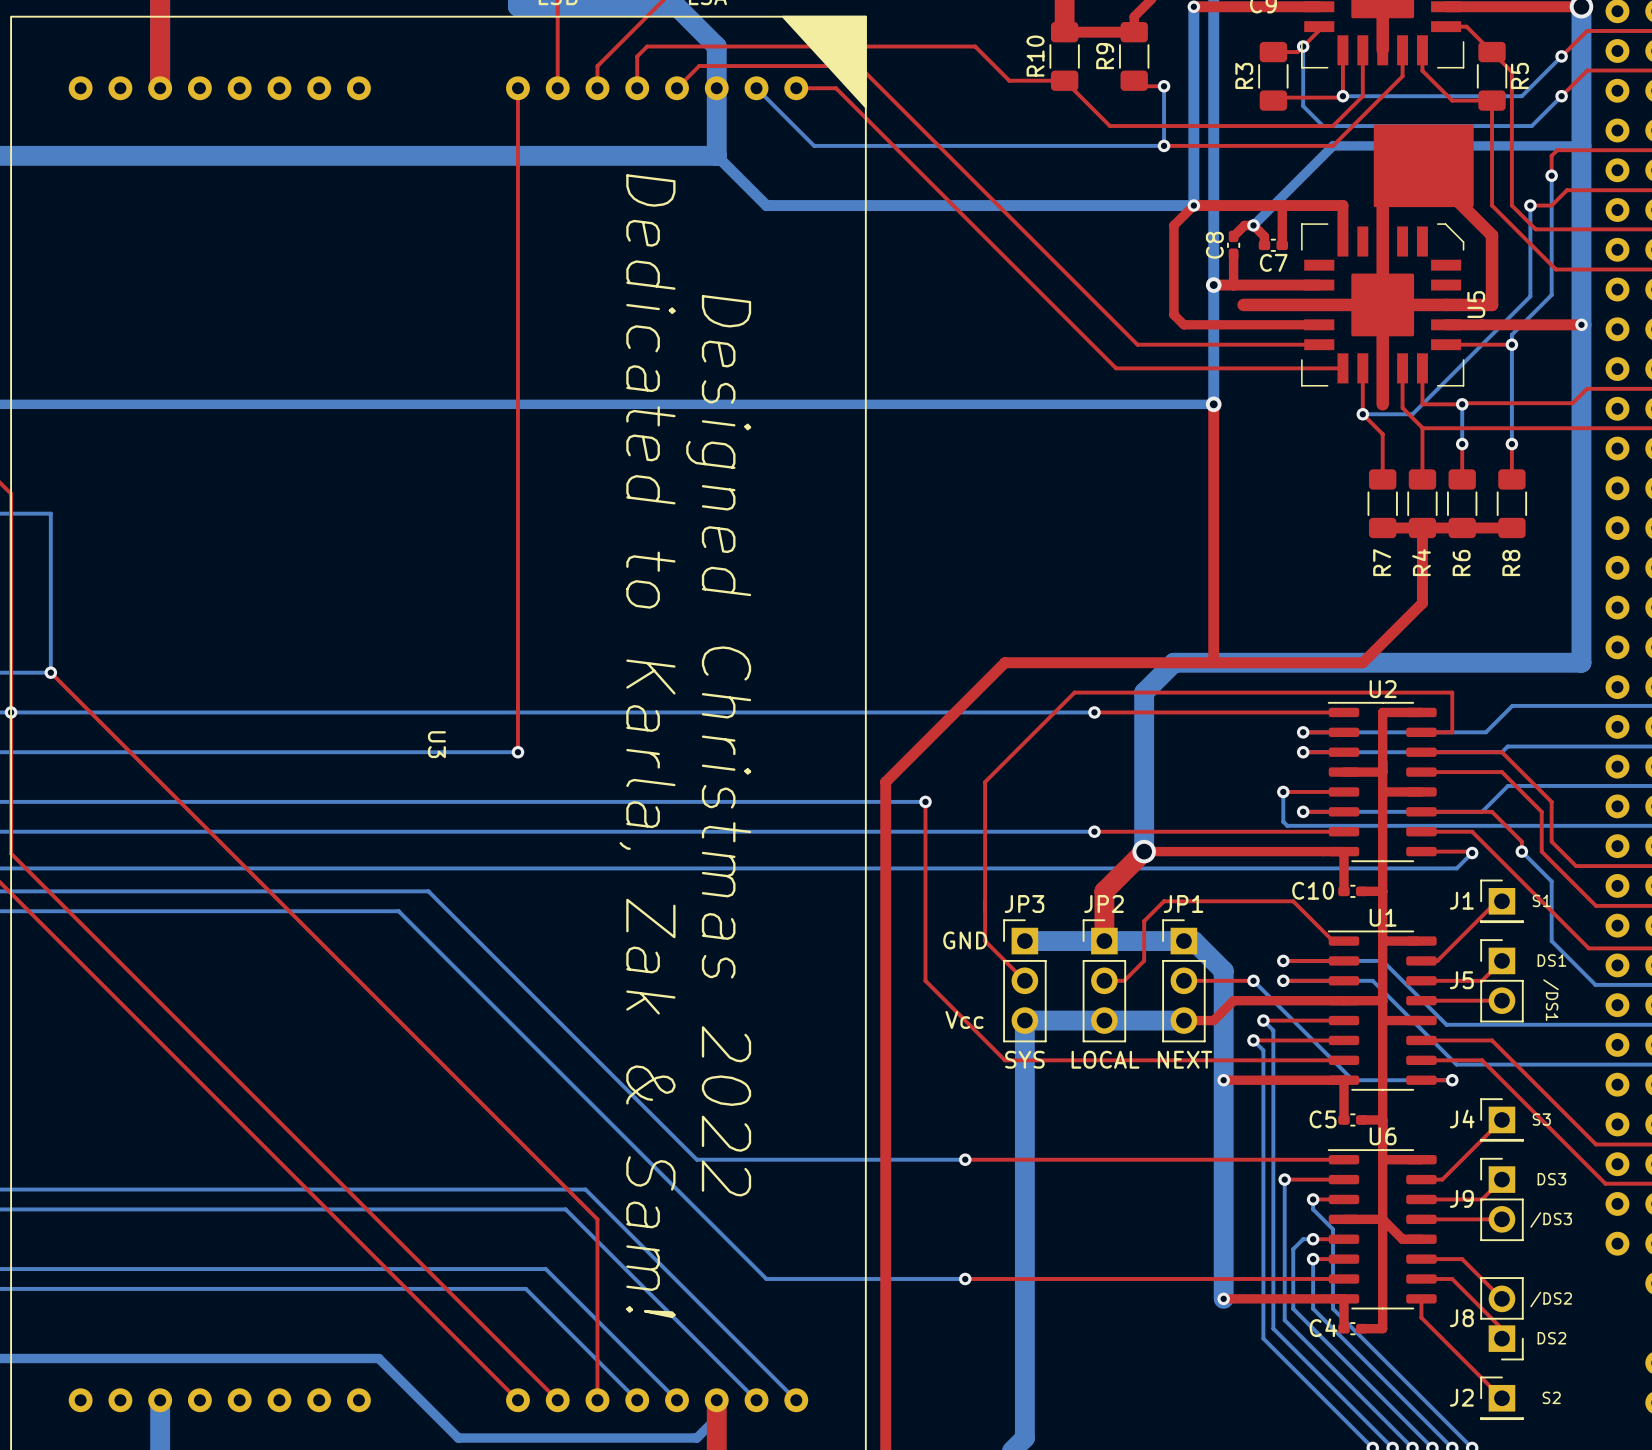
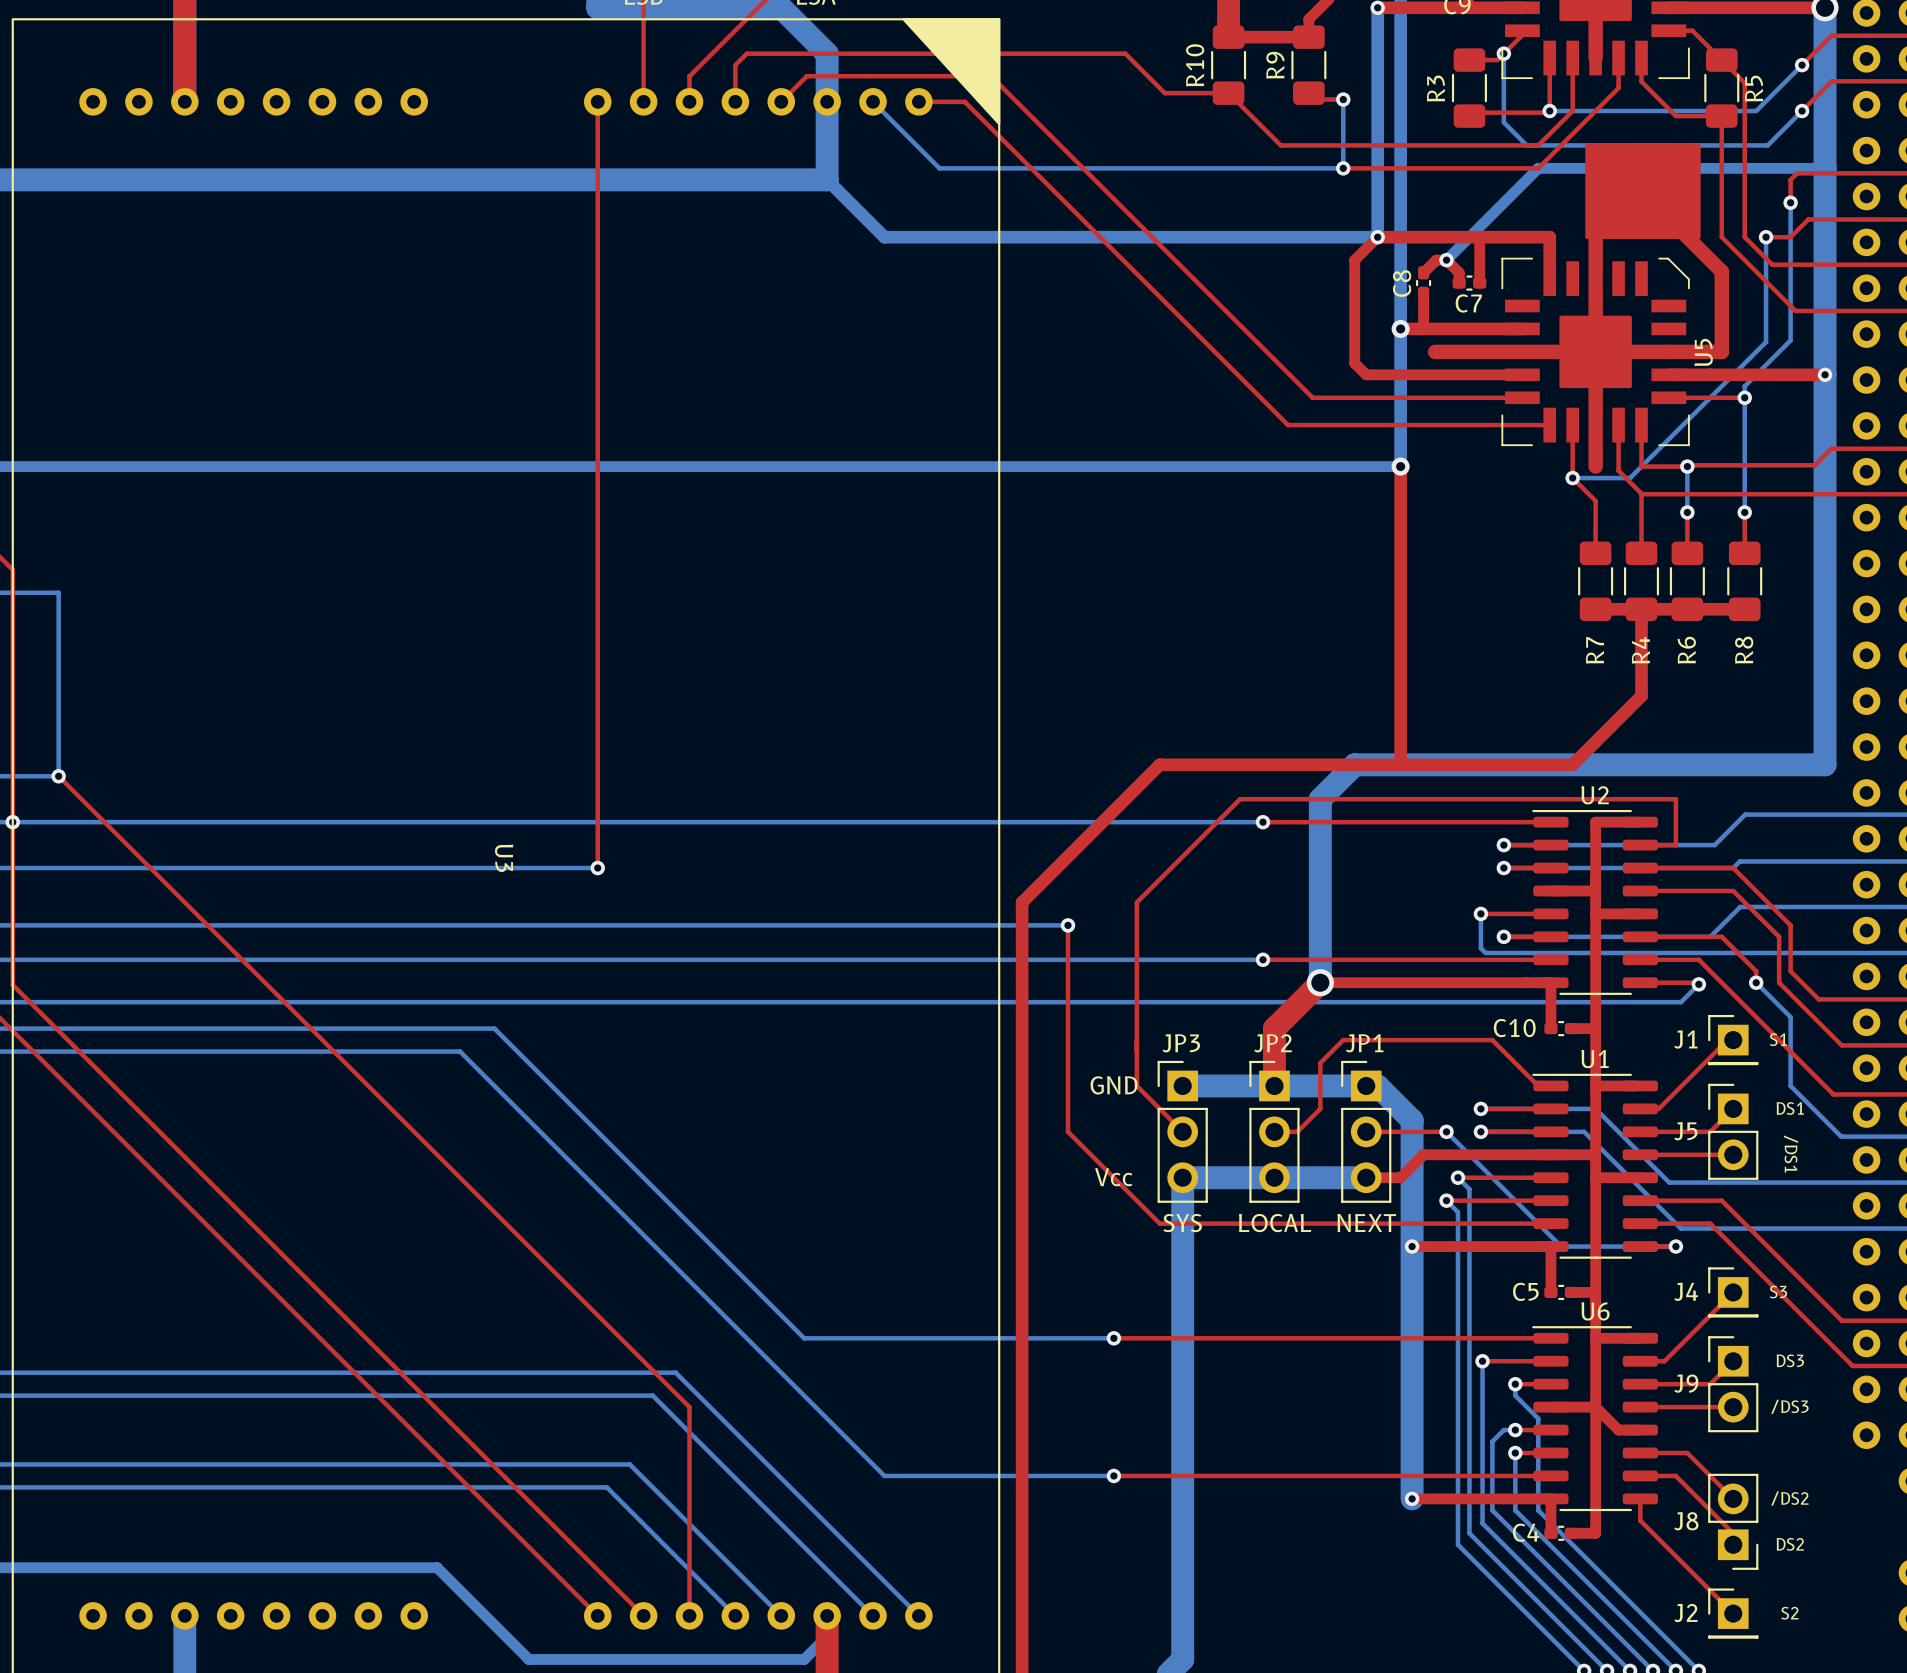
text: Designed Christmas 2022 (718, 745) -> none
text: Dedicated to Karla, Zak & Sam! (647, 746) -> none

